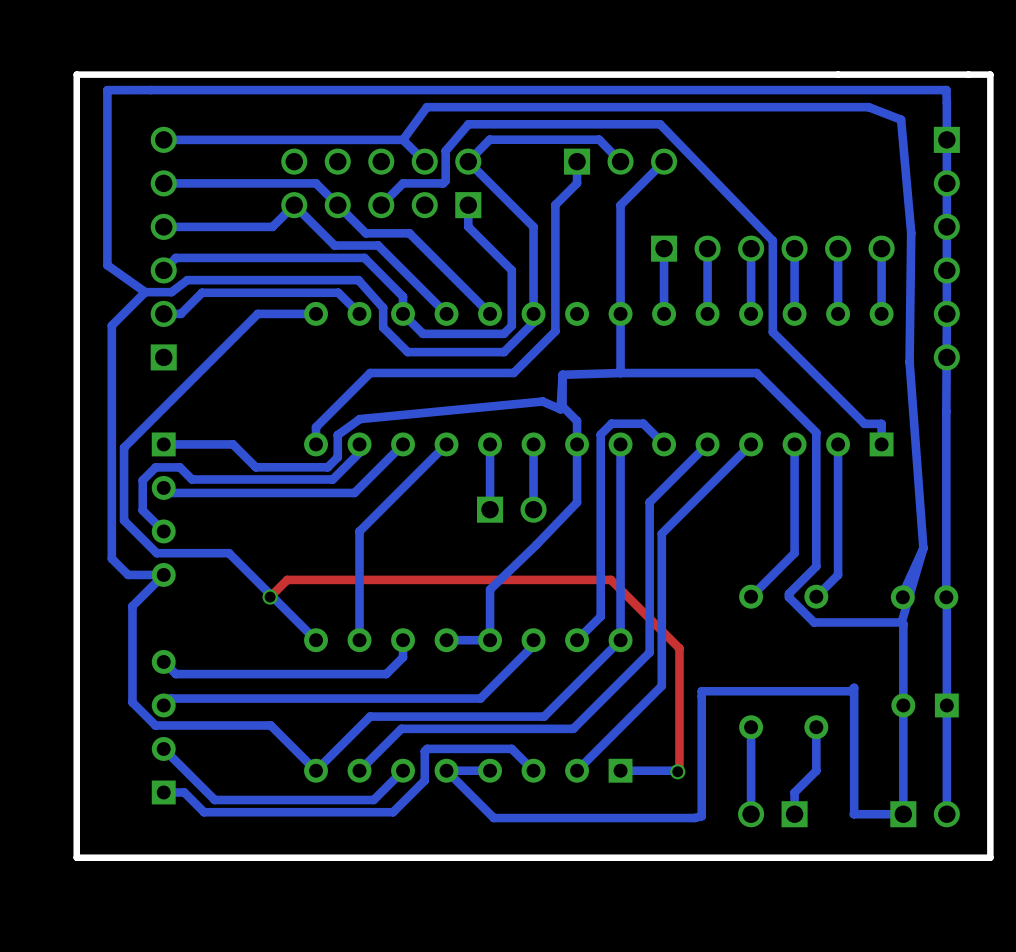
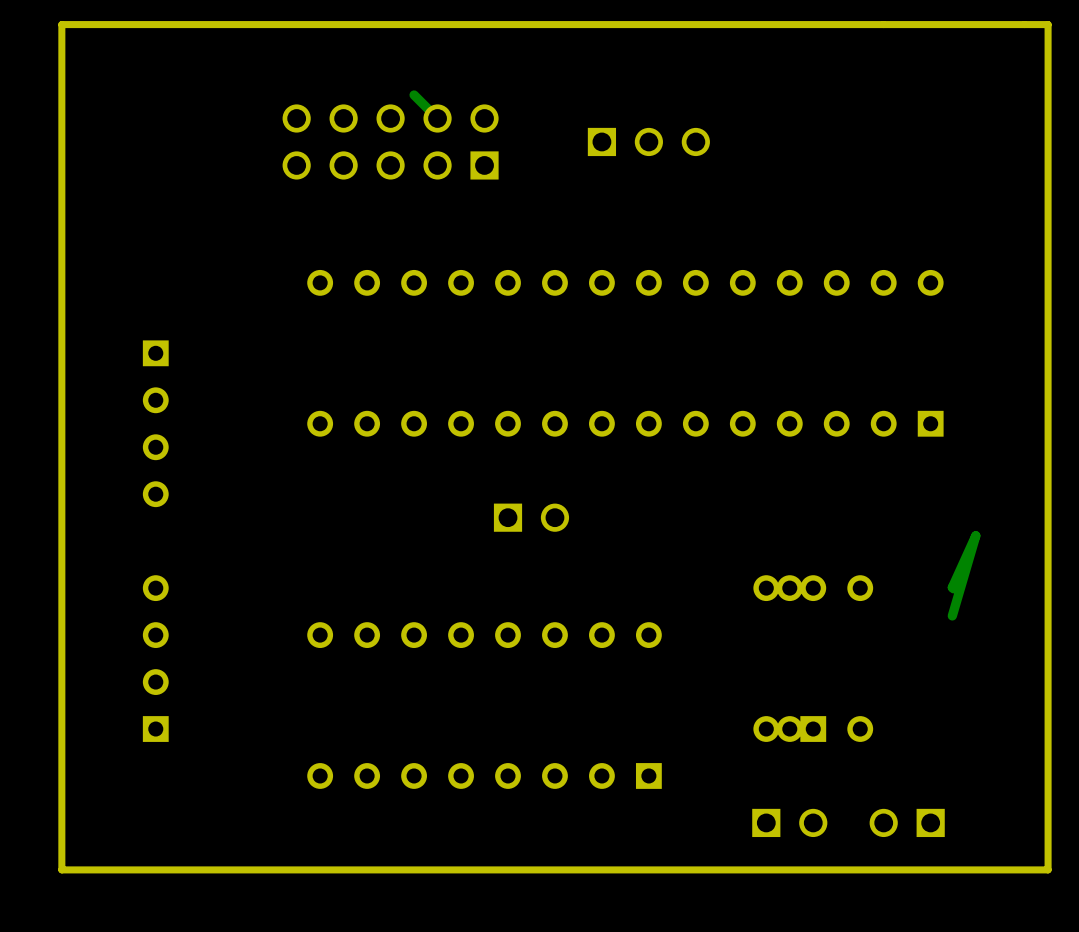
bottom track: (163, 139) (403, 139) (426, 107) (868, 107) (901, 119) (911, 233) (909, 361) (923, 548) -> none
bottom track: (577, 161) (577, 183) (555, 204) (555, 331) (513, 372) (370, 372) (316, 427) (316, 444) -> none
bottom track: (620, 161) (599, 139) (489, 139) (468, 161) (533, 226) (533, 322) (503, 352) (407, 352) (383, 327) (383, 307) (358, 280) (187, 280) (171, 292) (145, 292) -> none
part position: (620, 161) -> (648, 141)
bottom track: (664, 161) (620, 205) (620, 373) -> none
bottom track: (163, 183) (316, 183) (365, 233) (409, 233) (490, 313) -> none
bottom track: (381, 205) (403, 183) (443, 183) (445, 180) (445, 150) (468, 124) (660, 124) (772, 240) (772, 332) (864, 423) (881, 423) (881, 444) -> none
bottom track: (468, 205) (468, 226) (511, 270) (511, 325) (503, 333) (422, 333) (403, 313) (403, 296) (364, 257) (175, 257) (163, 270) -> none
bottom track: (163, 226) (272, 226) (294, 205) (334, 245) (378, 245) (446, 313) -> none
part: (163, 248) -> none
bottom track: (664, 248) (664, 313) -> none
bottom track: (707, 248) (707, 313) -> none
bottom track: (751, 248) (751, 313) -> none
part: (772, 248) -> none
bottom track: (794, 248) (794, 313) -> none
bottom track: (838, 248) (838, 313) -> none
bottom track: (881, 248) (881, 313) -> none
part: (946, 248) -> none
bottom track: (145, 292) (111, 325) (111, 558) (128, 574) (163, 574) (132, 606) (132, 702) (155, 725) (270, 725) (316, 770) (370, 716) (544, 716) (620, 640) (620, 444) -> none
bottom track: (145, 292) (107, 265) (107, 90) (946, 90) (946, 814) -> none
bottom track: (316, 313) (257, 313) (124, 447) (124, 520) (156, 553) (229, 553) (316, 640) -> none
bottom track: (359, 313) (338, 292) (202, 292) (180, 313) (163, 313) -> none
bottom track: (620, 373) (562, 374) -> none
bottom track: (620, 373) (756, 373) (816, 432) (816, 566) (788, 593) (788, 597) (814, 622) (901, 622) (903, 624) (903, 814) (853, 814) (854, 687) (850, 691) (701, 691) (701, 816) (694, 818) (493, 818) (446, 770) (490, 770) -> none
bottom track: (562, 374) (560, 409) (542, 401) (359, 419) (337, 435) (337, 457) (327, 467) (255, 467) (233, 444) (163, 444) -> none
bottom track: (562, 374) (562, 406) (577, 420) (577, 502) (490, 589) (490, 640) (446, 640) -> none
bottom track: (359, 444) (359, 452) (332, 479) (192, 479) (179, 467) (155, 467) (142, 480) (142, 510) (163, 531) -> none
bottom track: (403, 444) (354, 492) (168, 492) (163, 487) -> none
bottom track: (446, 444) (359, 531) (359, 640) -> none
bottom track: (490, 444) (490, 509) -> none
bottom track: (533, 444) (533, 509) -> none
bottom track: (664, 444) (643, 423) (611, 423) (600, 434) (600, 616) (577, 640) -> none
bottom track: (707, 444) (649, 502) (649, 652) (573, 728) (401, 728) (359, 770) -> none
bottom track: (751, 444) (661, 533) (661, 685) (577, 770) -> none
bottom track: (794, 444) (794, 553) (751, 596) -> none
bottom track: (838, 444) (838, 574) (816, 596) -> none
part position: (163, 509) -> (155, 423)
part position: (511, 509) -> (531, 517)
top track: (270, 597) (287, 579) (610, 579) (679, 648) (679, 770) (677, 771) -> none
via: (270, 597) -> none
part position: (924, 597) -> (789, 588)
bottom track: (403, 640) (403, 657) (386, 674) (175, 674) (163, 661) -> none
bottom track: (533, 640) (533, 645) (480, 698) (170, 698) (163, 705) -> none
part position: (925, 705) -> (789, 729)
part position: (163, 727) -> (155, 658)
bottom track: (751, 727) (751, 814) -> none
bottom track: (816, 727) (816, 770) (794, 792) (794, 814) -> none
bottom track: (163, 748) (214, 800) (373, 800) (403, 770) -> none
bottom track: (533, 770) (511, 748) (427, 748) (424, 751) (424, 780) (393, 812) (204, 812) (184, 792) (163, 792) -> none
bottom track: (620, 770) (677, 771) -> none
via: (677, 771) -> none
part rotation: 0° (772, 814) -> 180° (789, 822)
part: none -> (907, 822)
part: (925, 814) -> none

